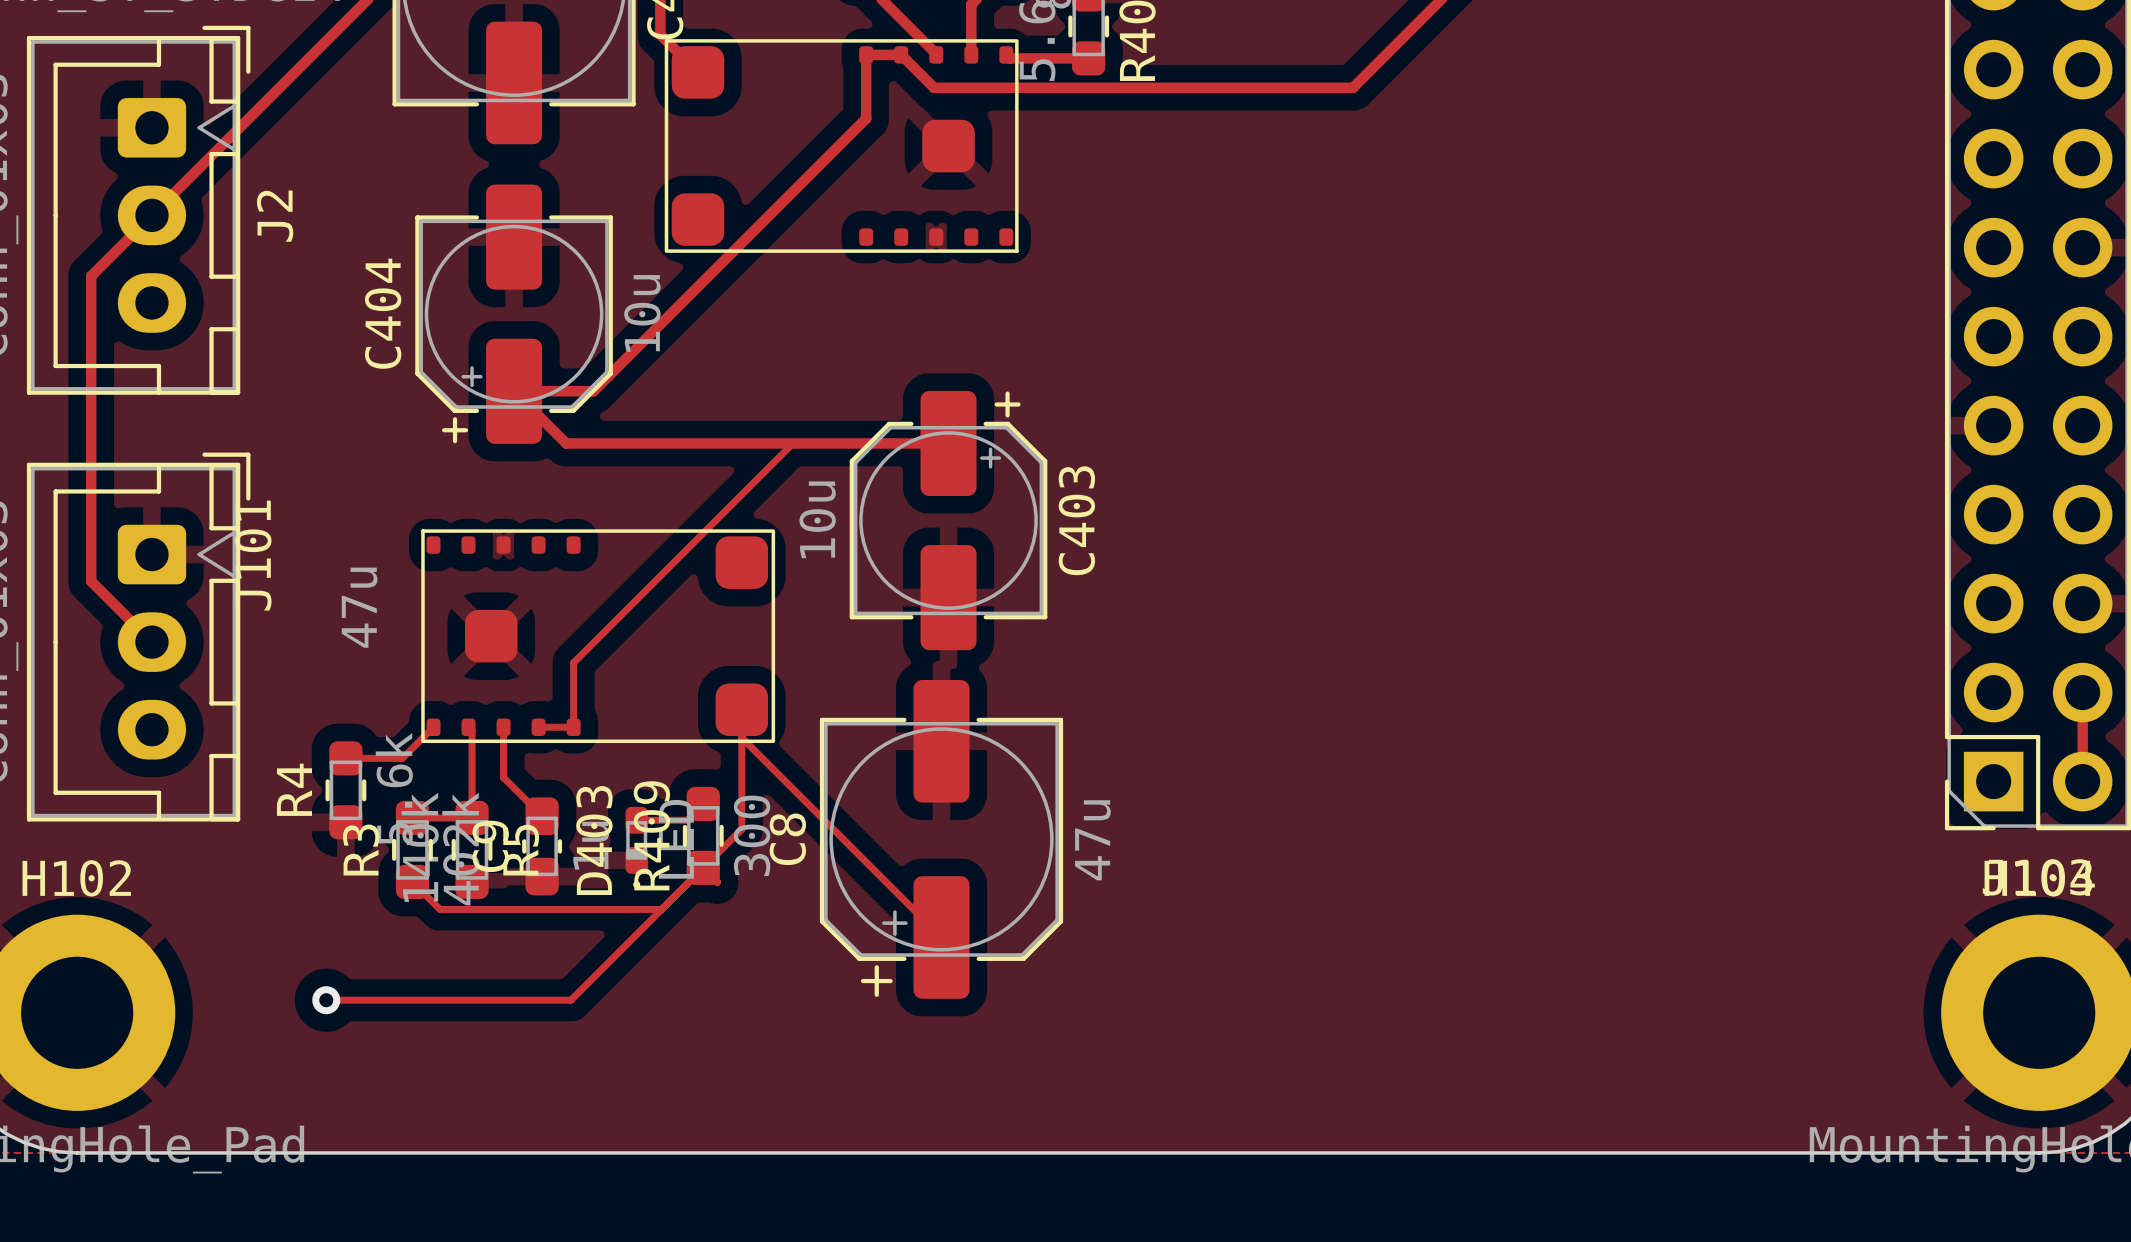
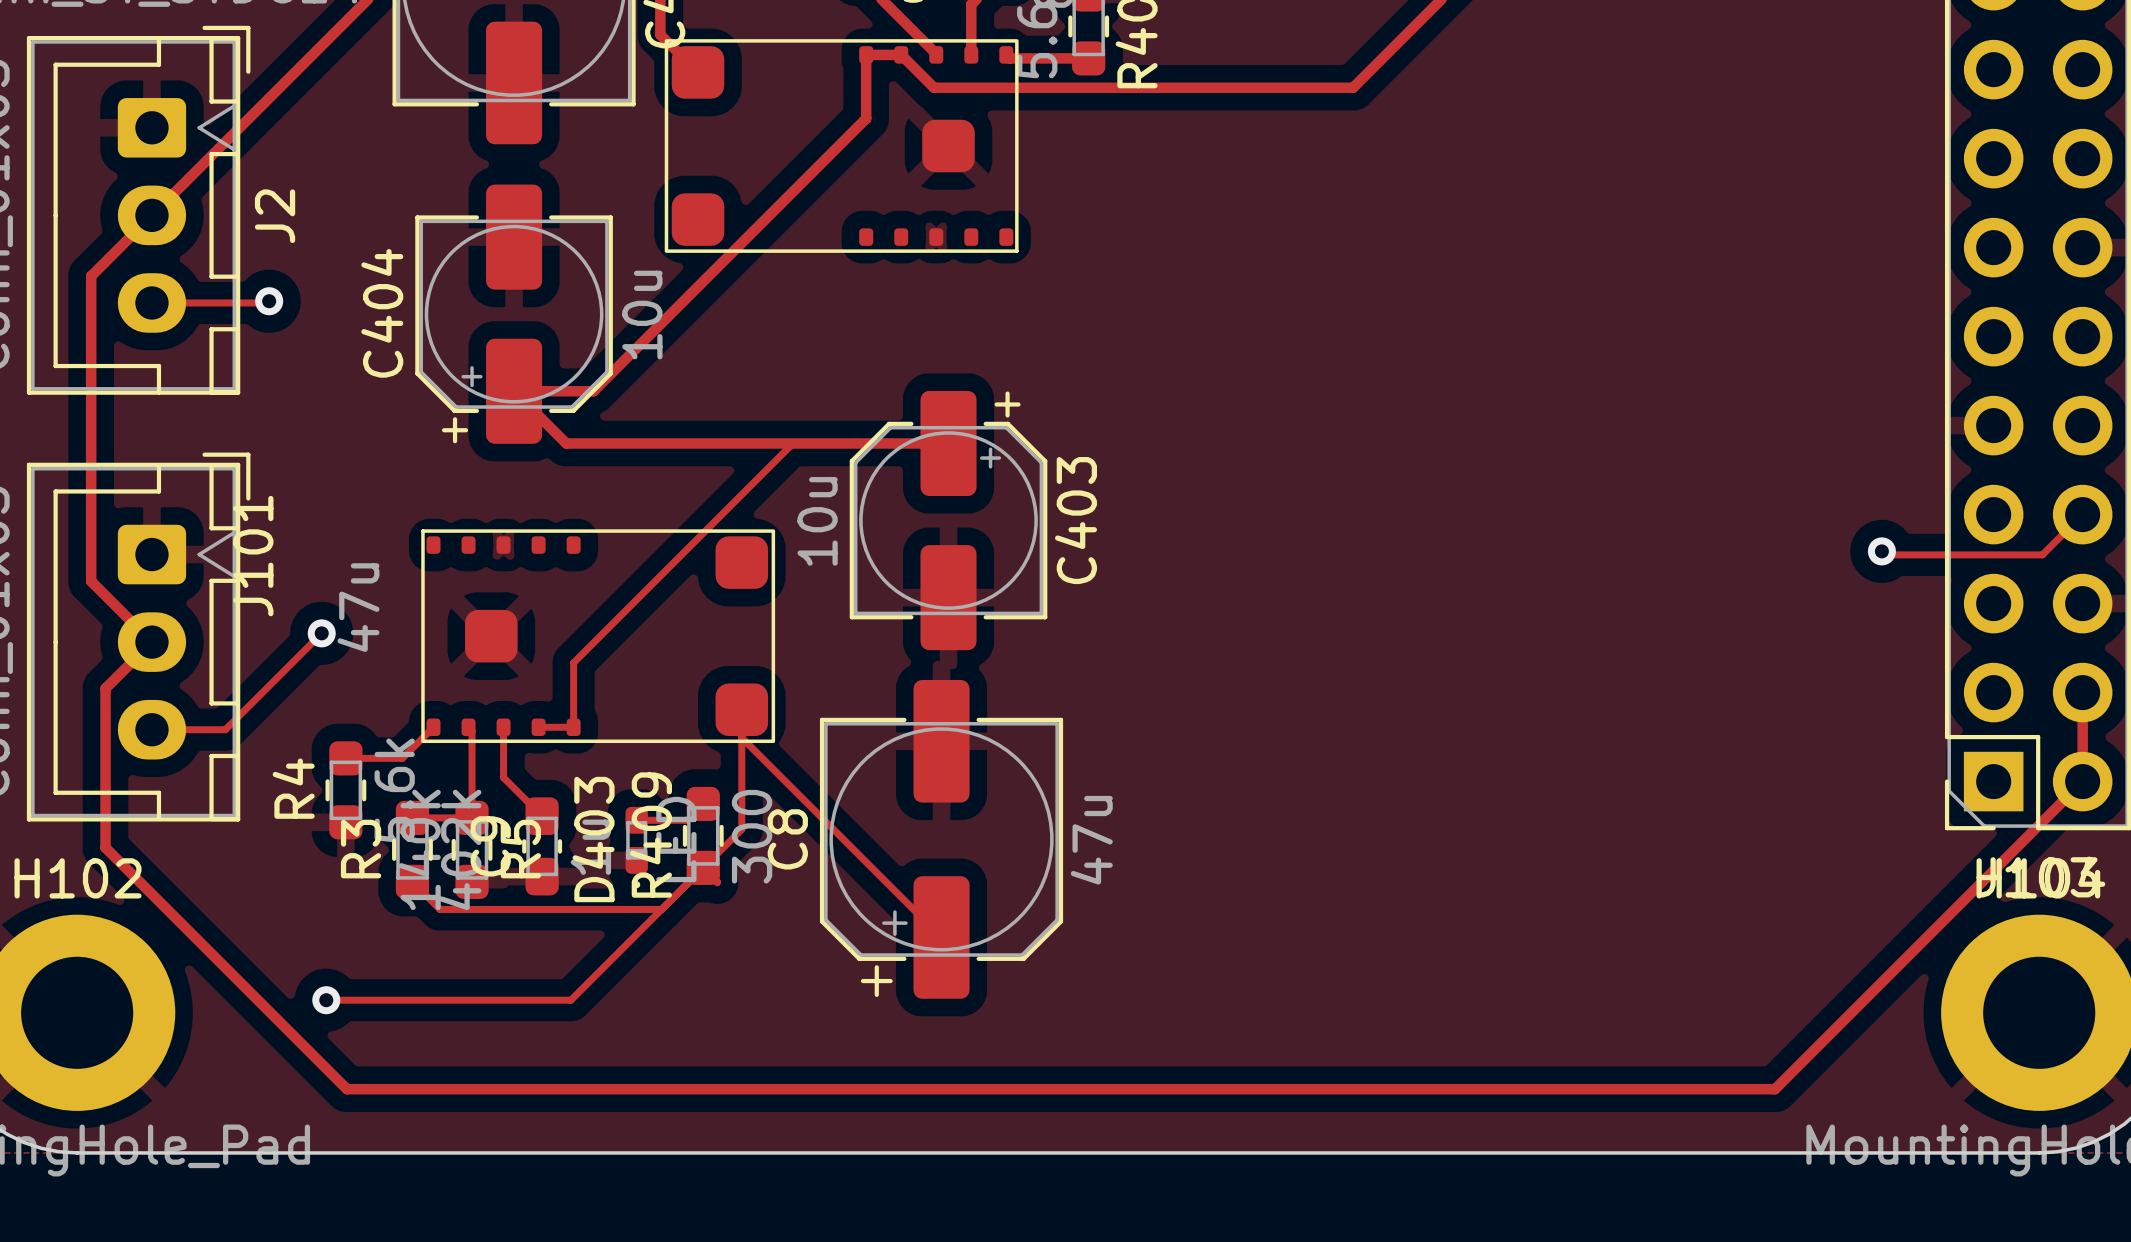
track: none -> (269, 301) (267, 302) (151, 302)
via: none -> (269, 301)
track: none -> (2082, 514) (2042, 554) (1885, 554) (1881, 551)
via: none -> (1881, 551)
track: none -> (321, 633) (225, 729) (151, 729)
via: none -> (321, 633)
track: none -> (151, 642) (105, 688) (105, 847) (346, 1089) (1775, 1089) (2082, 781)

